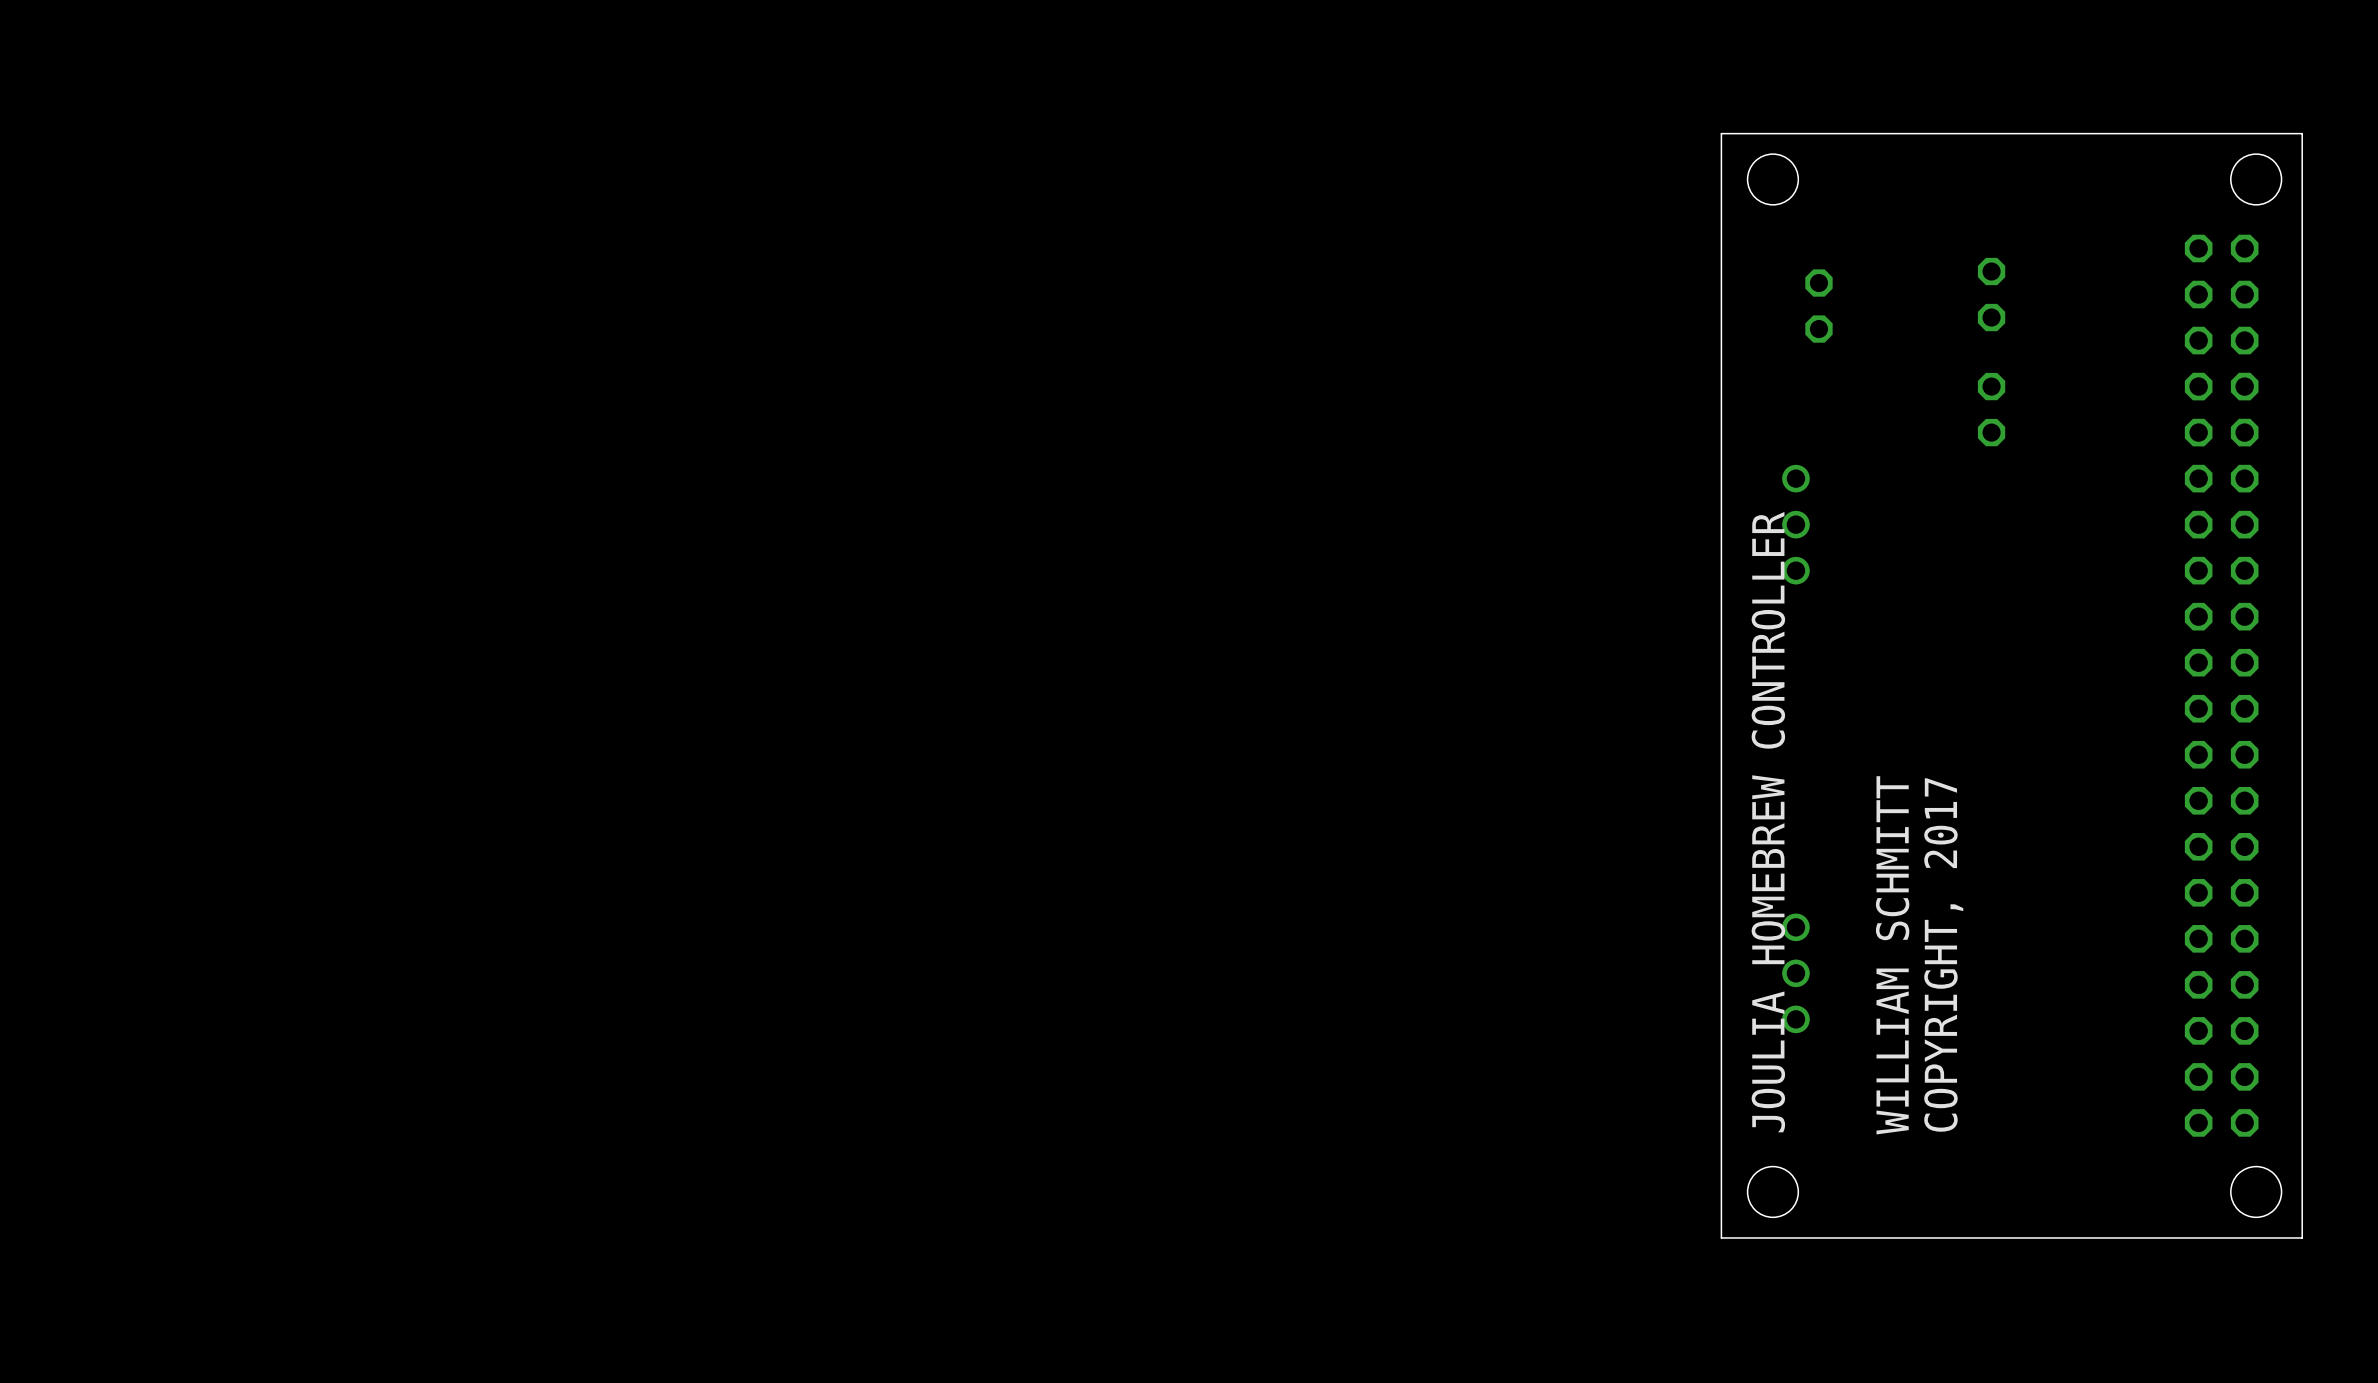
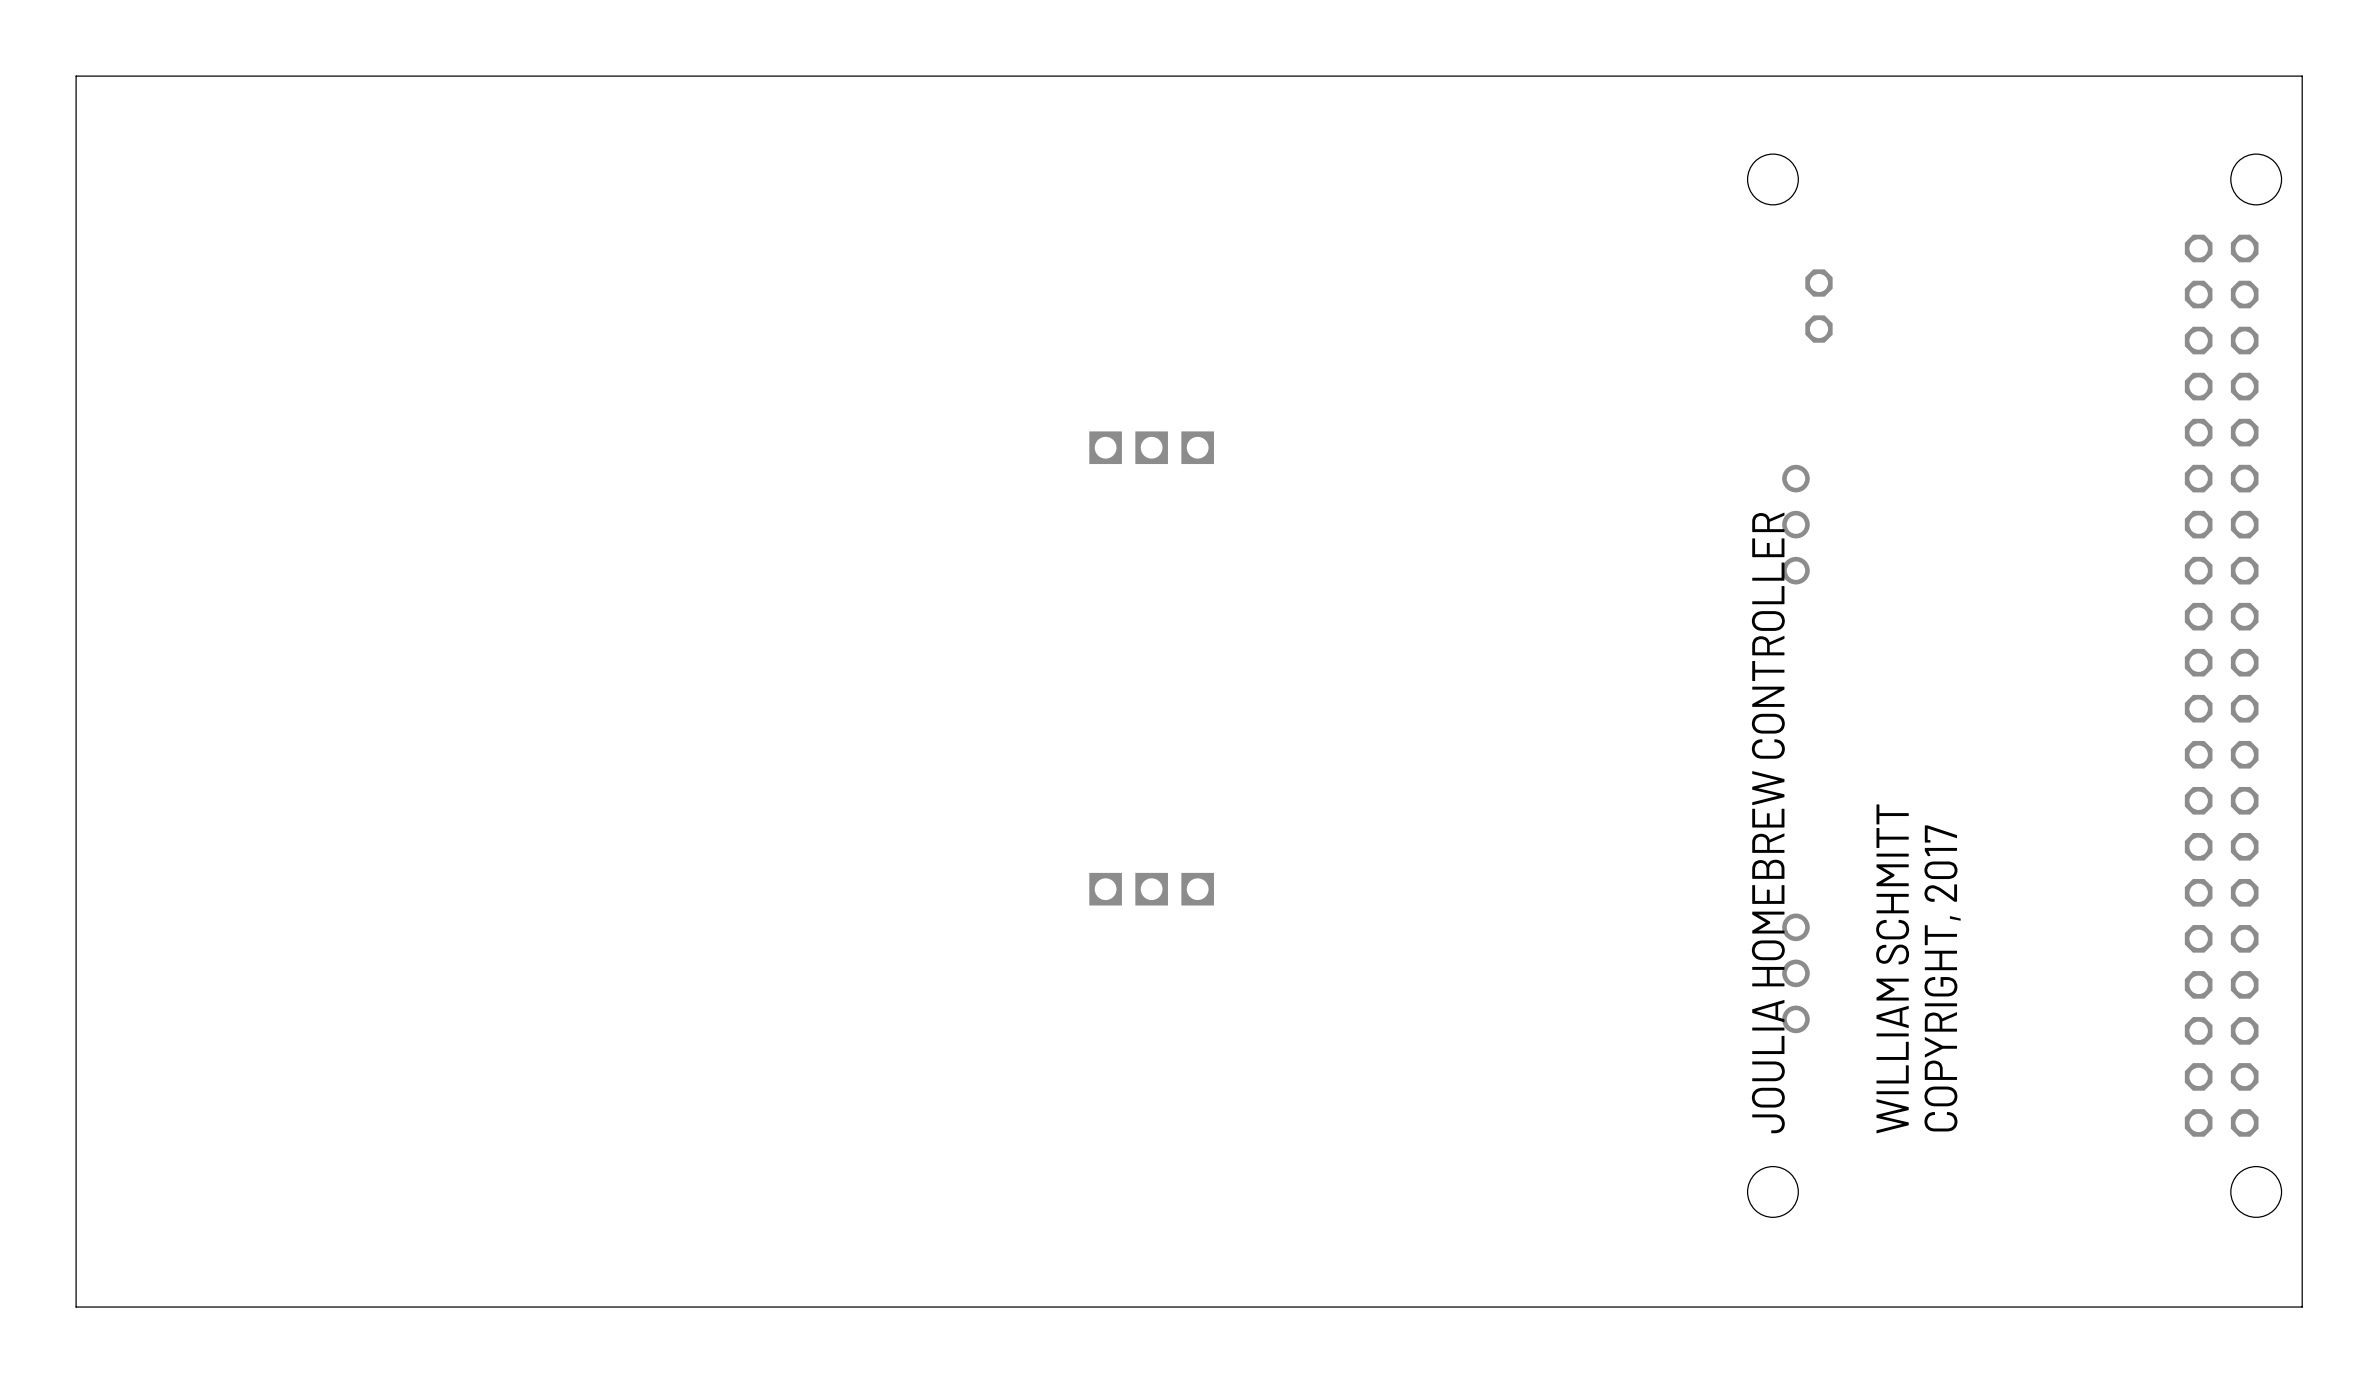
board edge: (2302, 133) (1721, 133) (1721, 1237) (2302, 1237) -> (2302, 133) (2302, 76) (76, 76) (76, 1307) (2302, 1307) (2302, 1237)
part: (1991, 294) -> none
part: (1991, 409) -> none
part: none -> (1151, 447)
part: none -> (1151, 889)

